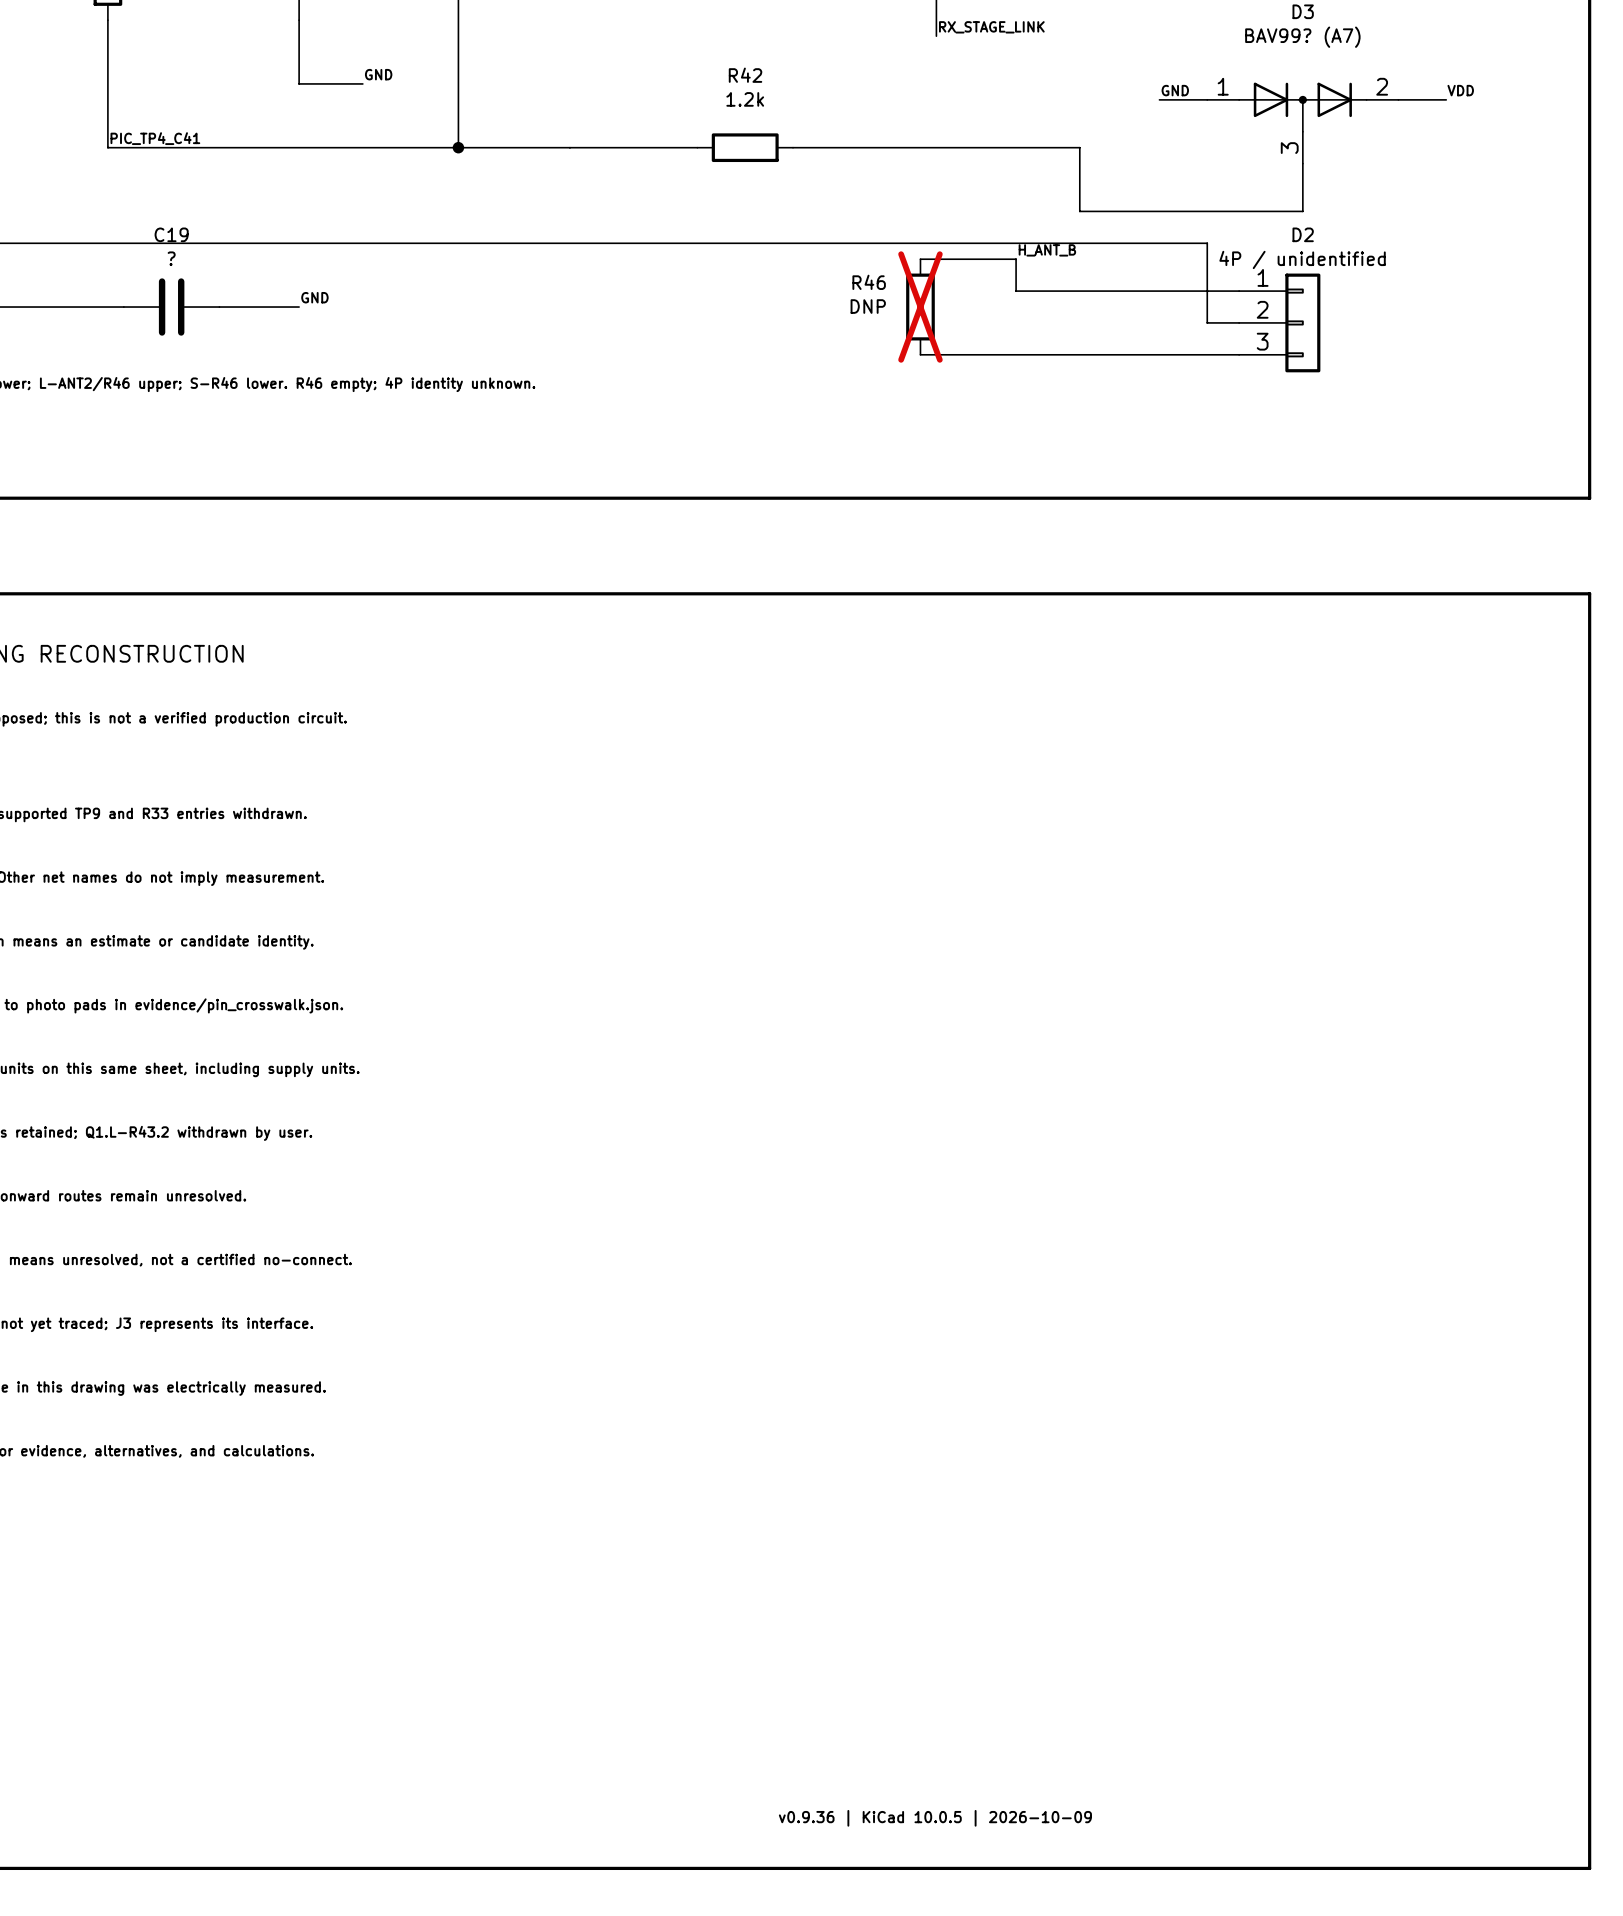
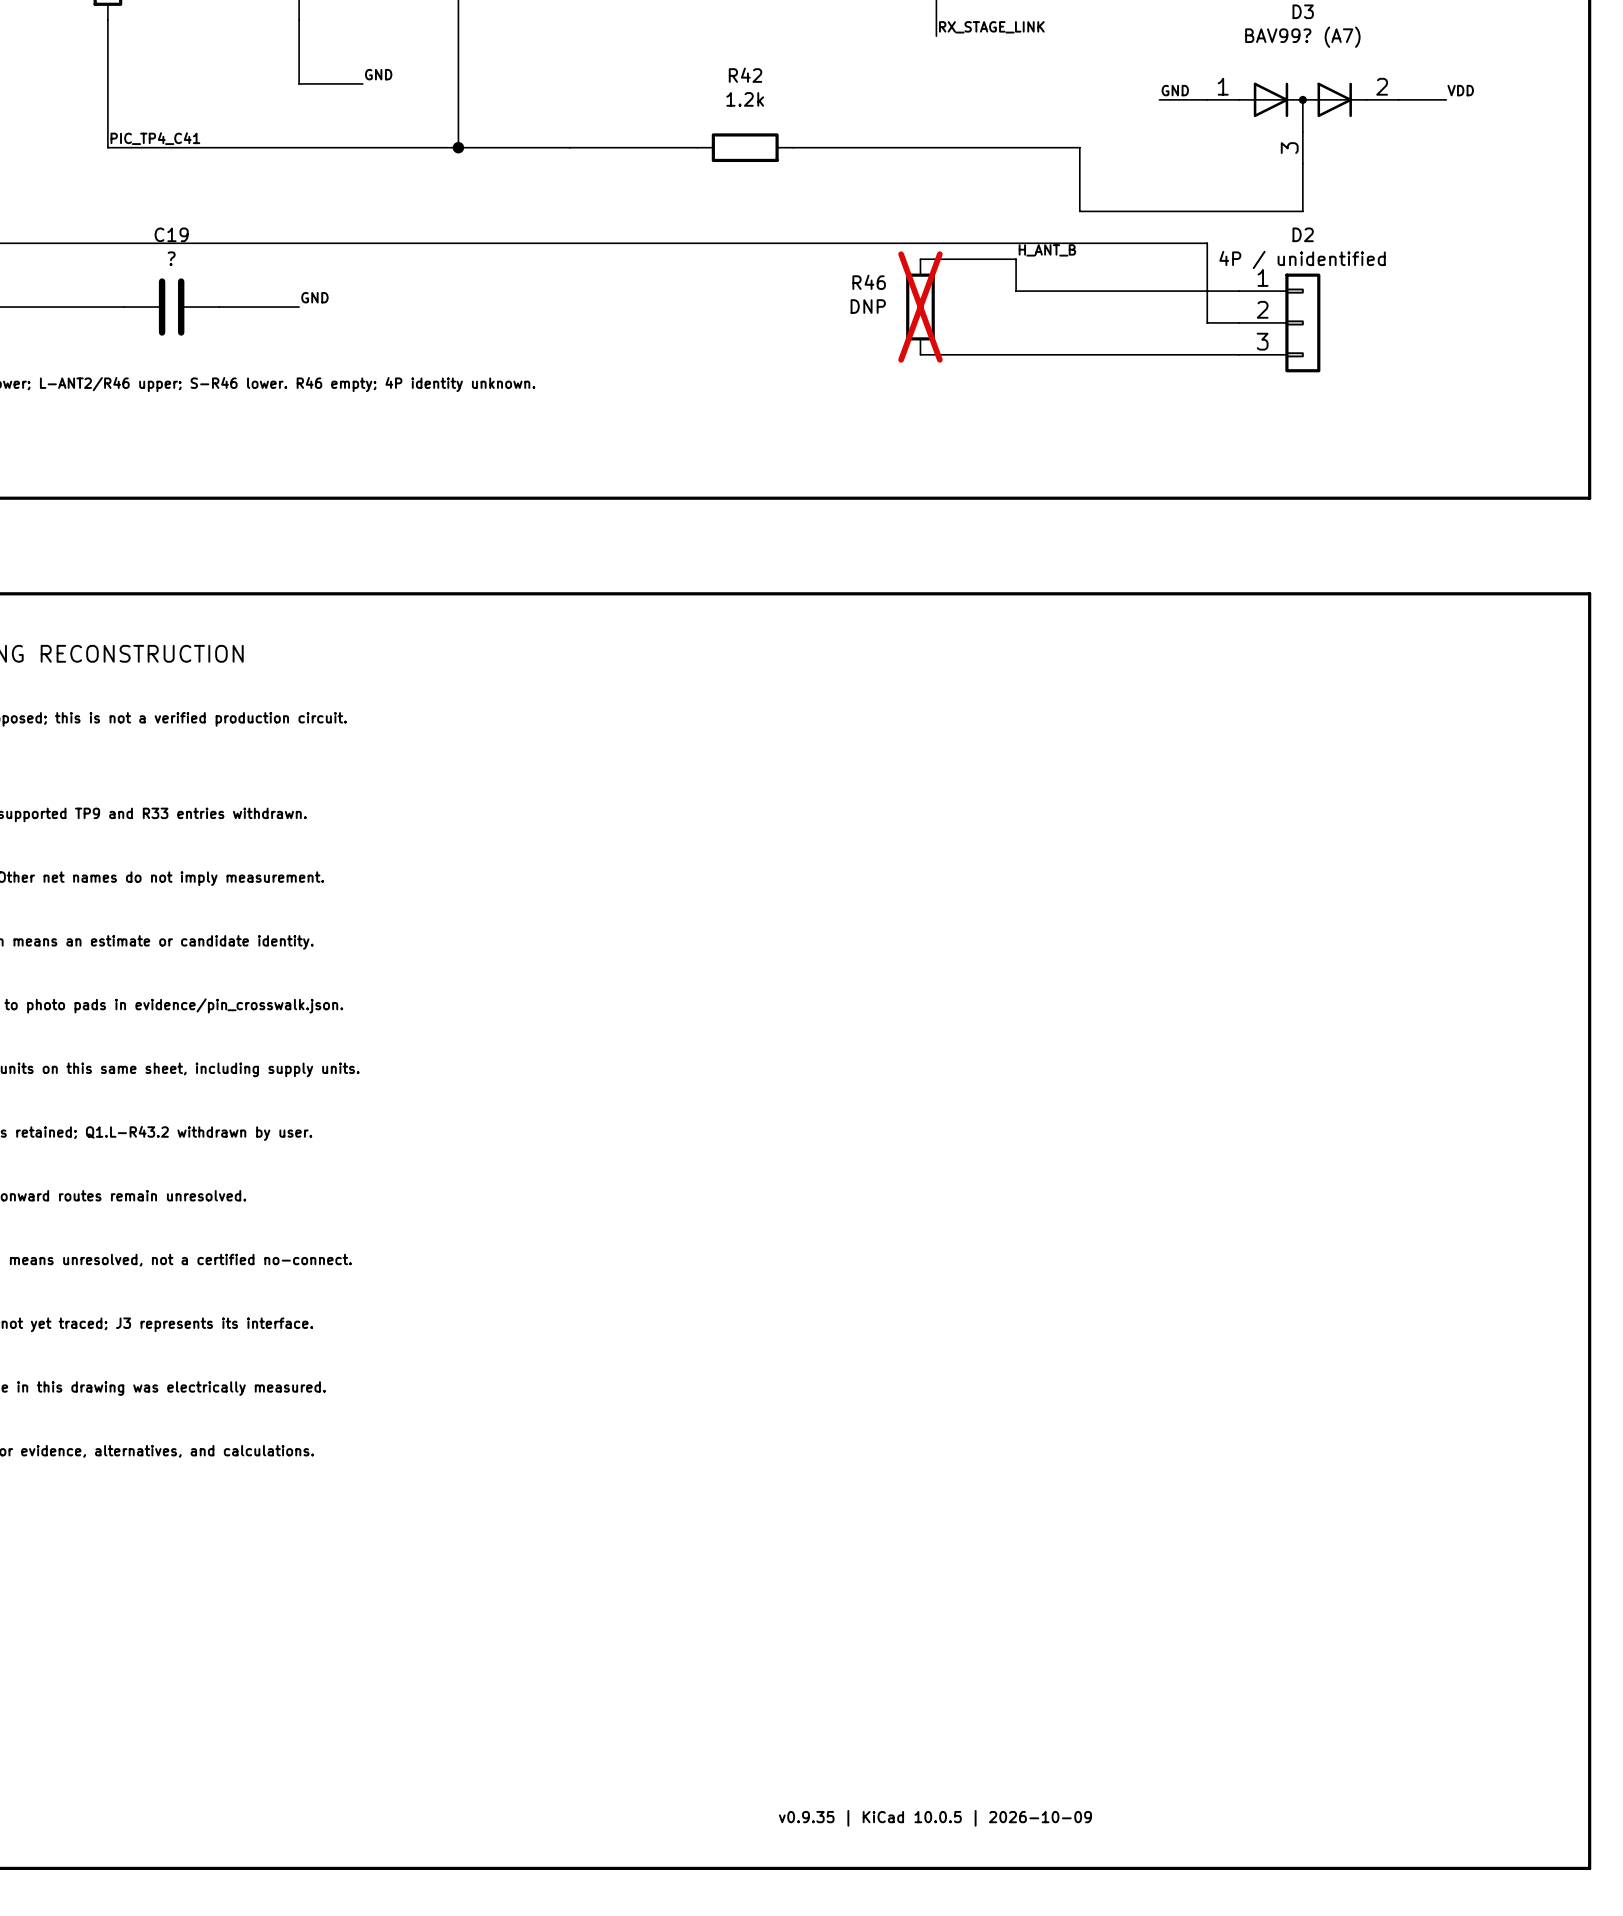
text: v0.9.36 | KiCad 10.0.5 | 2026-10-09 (935, 1818) -> v0.9.35 | KiCad 10.0.5 | 2026-10-09 (935, 1818)

